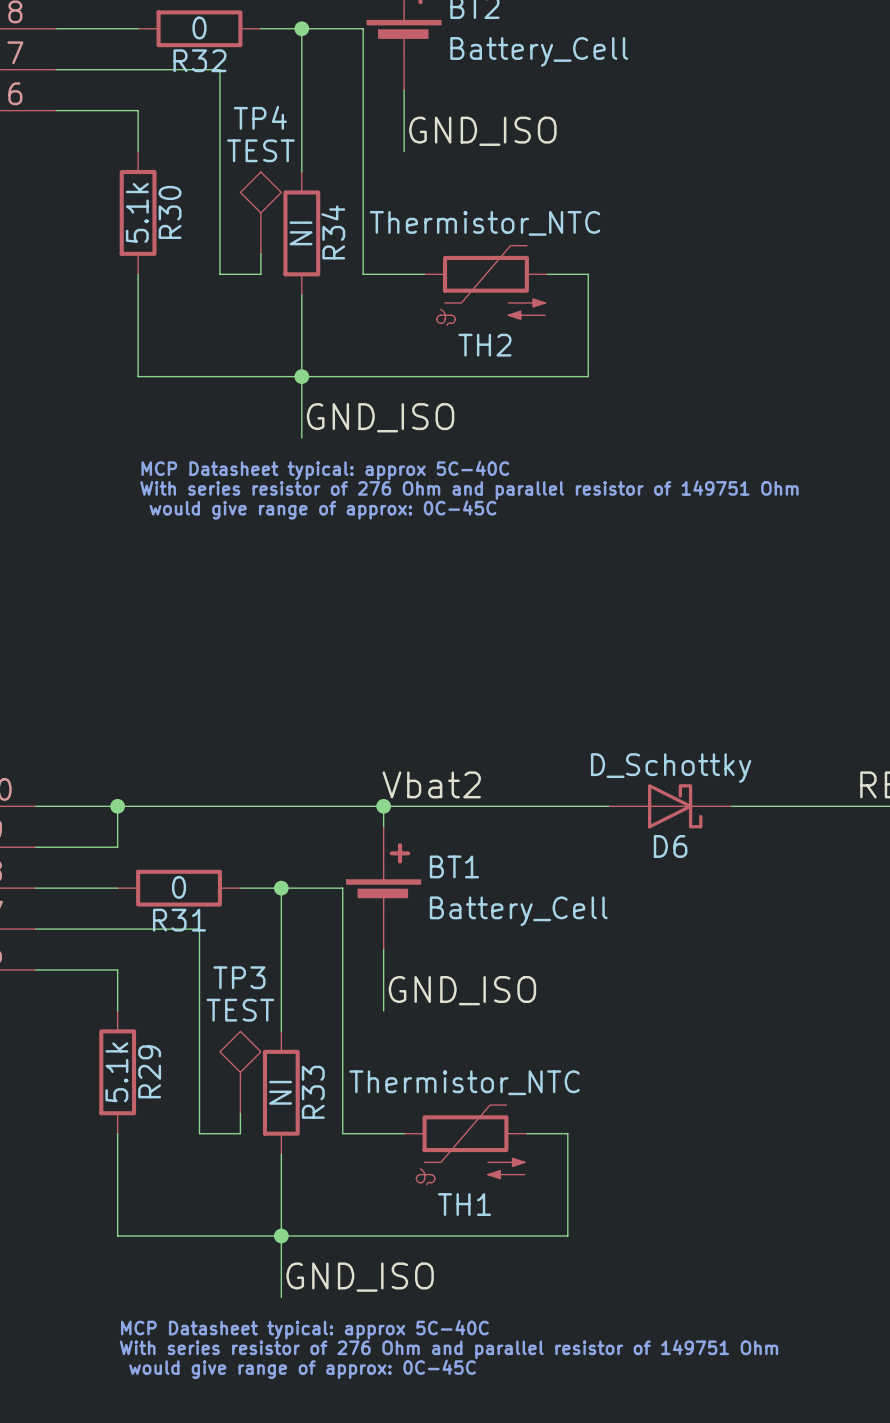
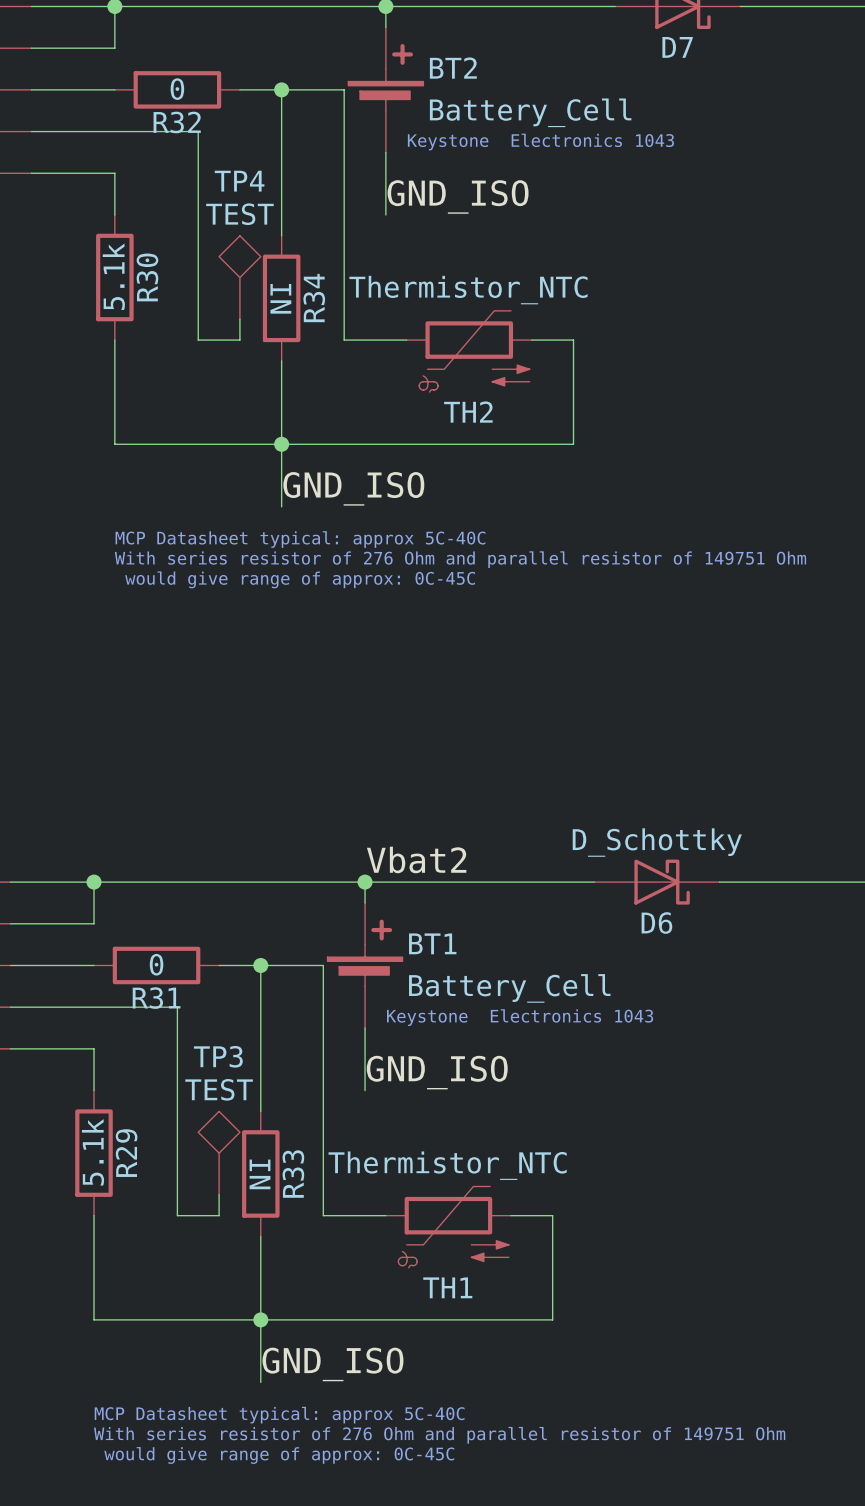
text: none -> Keystone Electronics 1043 (540, 142)
text: none -> Keystone Electronics 1043 (520, 1017)

